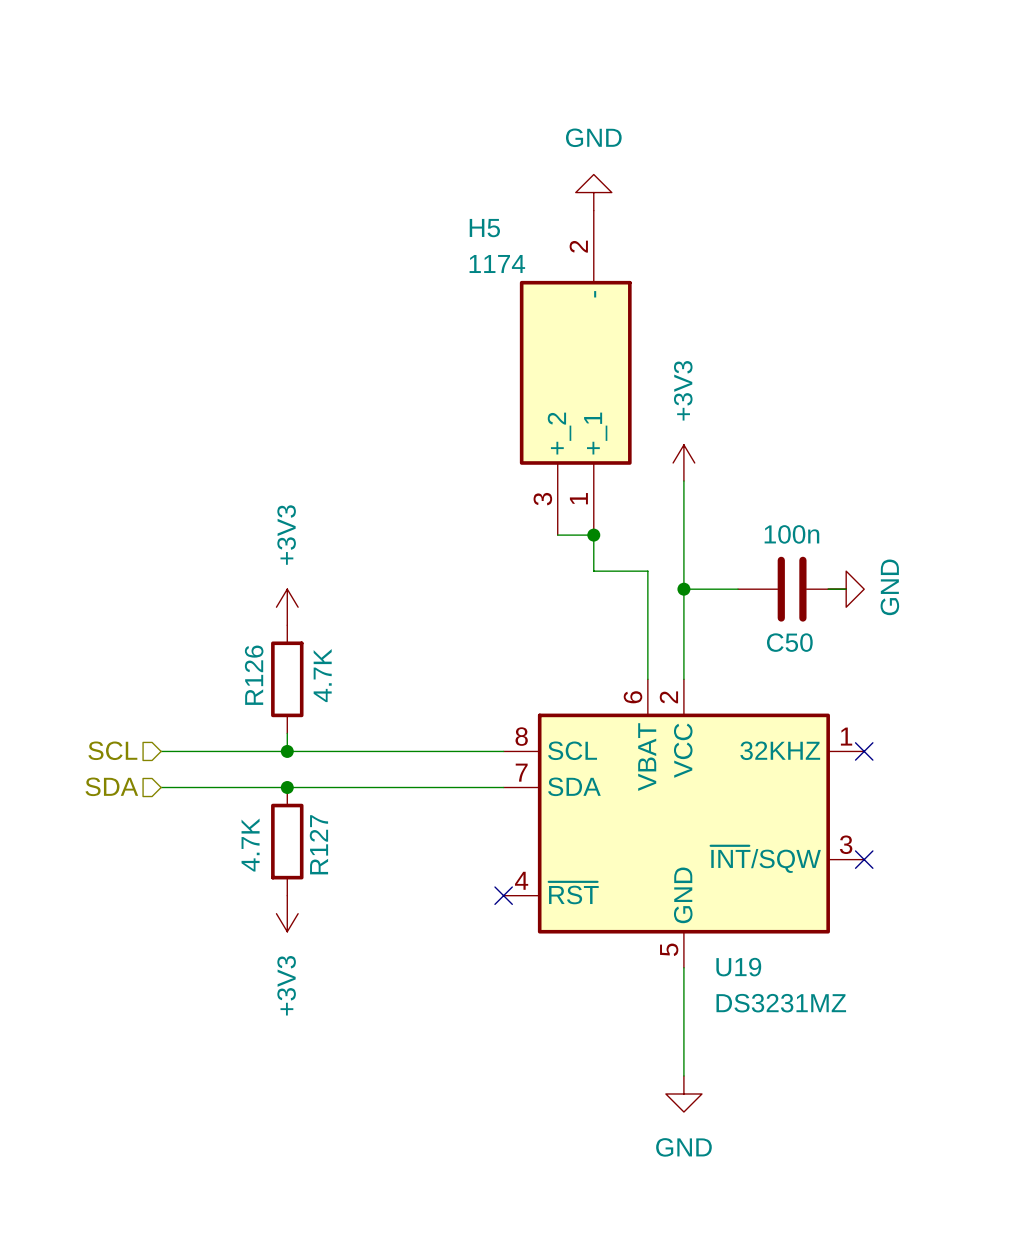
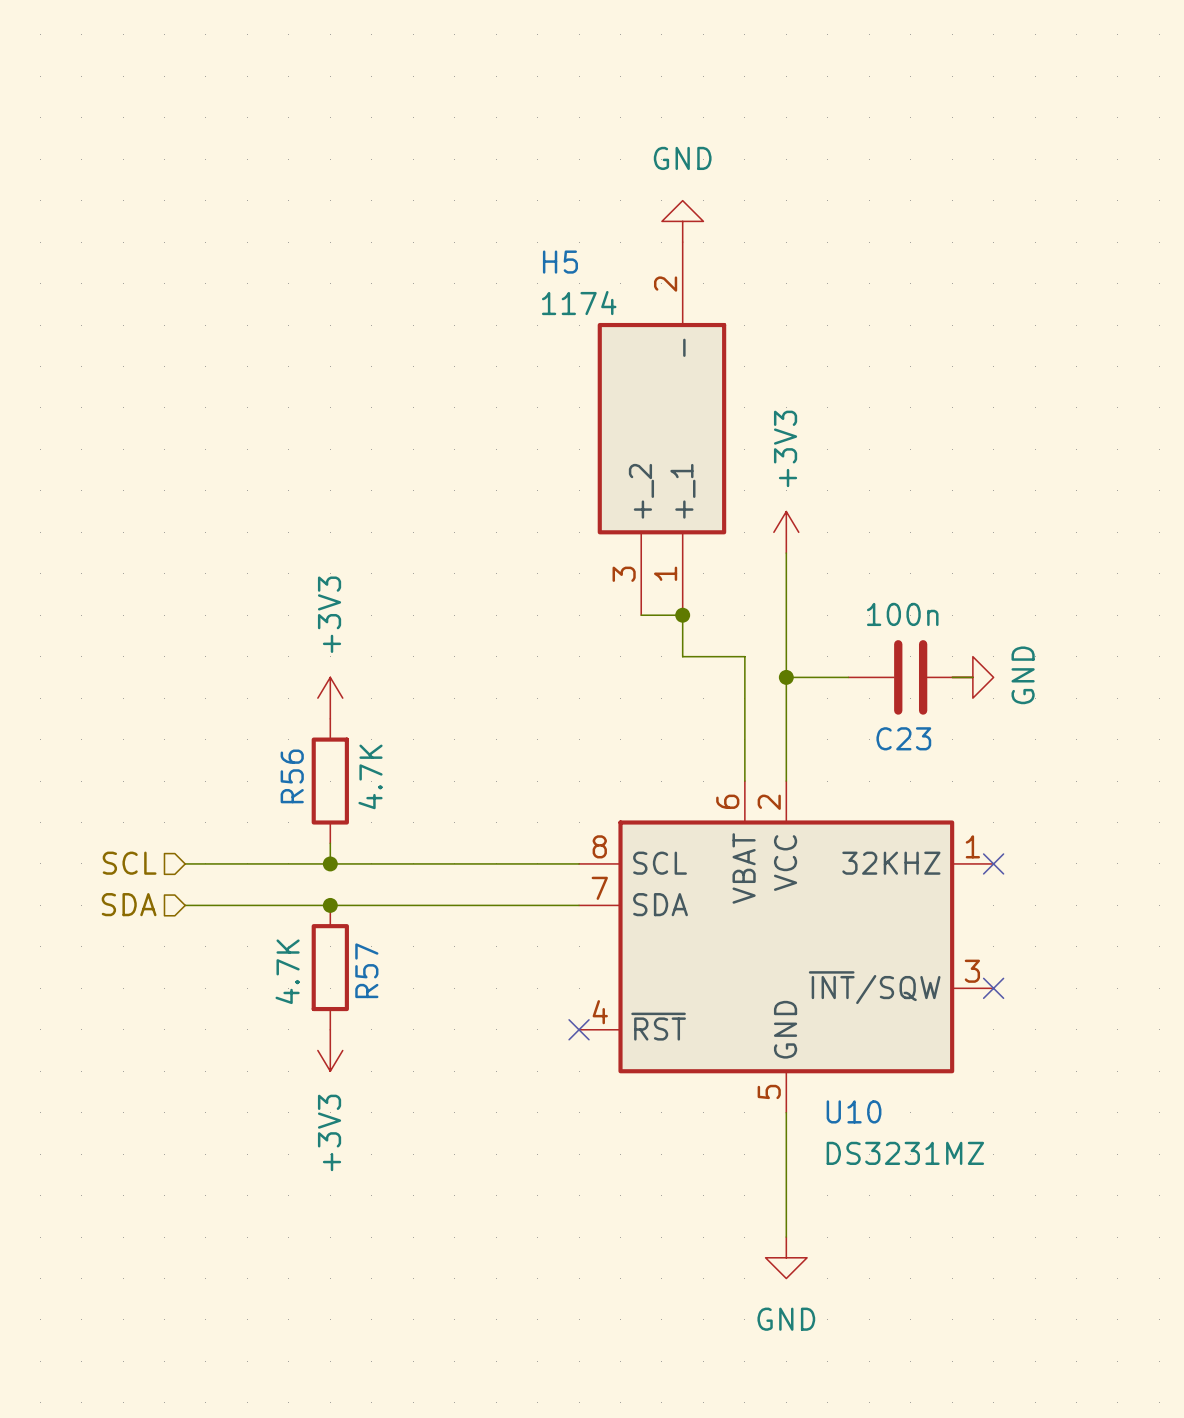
C50 name: C50 (789, 642) -> C23 (903, 738)
R126 name: R126 (254, 675) -> R56 (292, 776)
R127 name: R127 (318, 844) -> R57 (366, 970)
U19 name: U19 (738, 967) -> U10 (854, 1111)

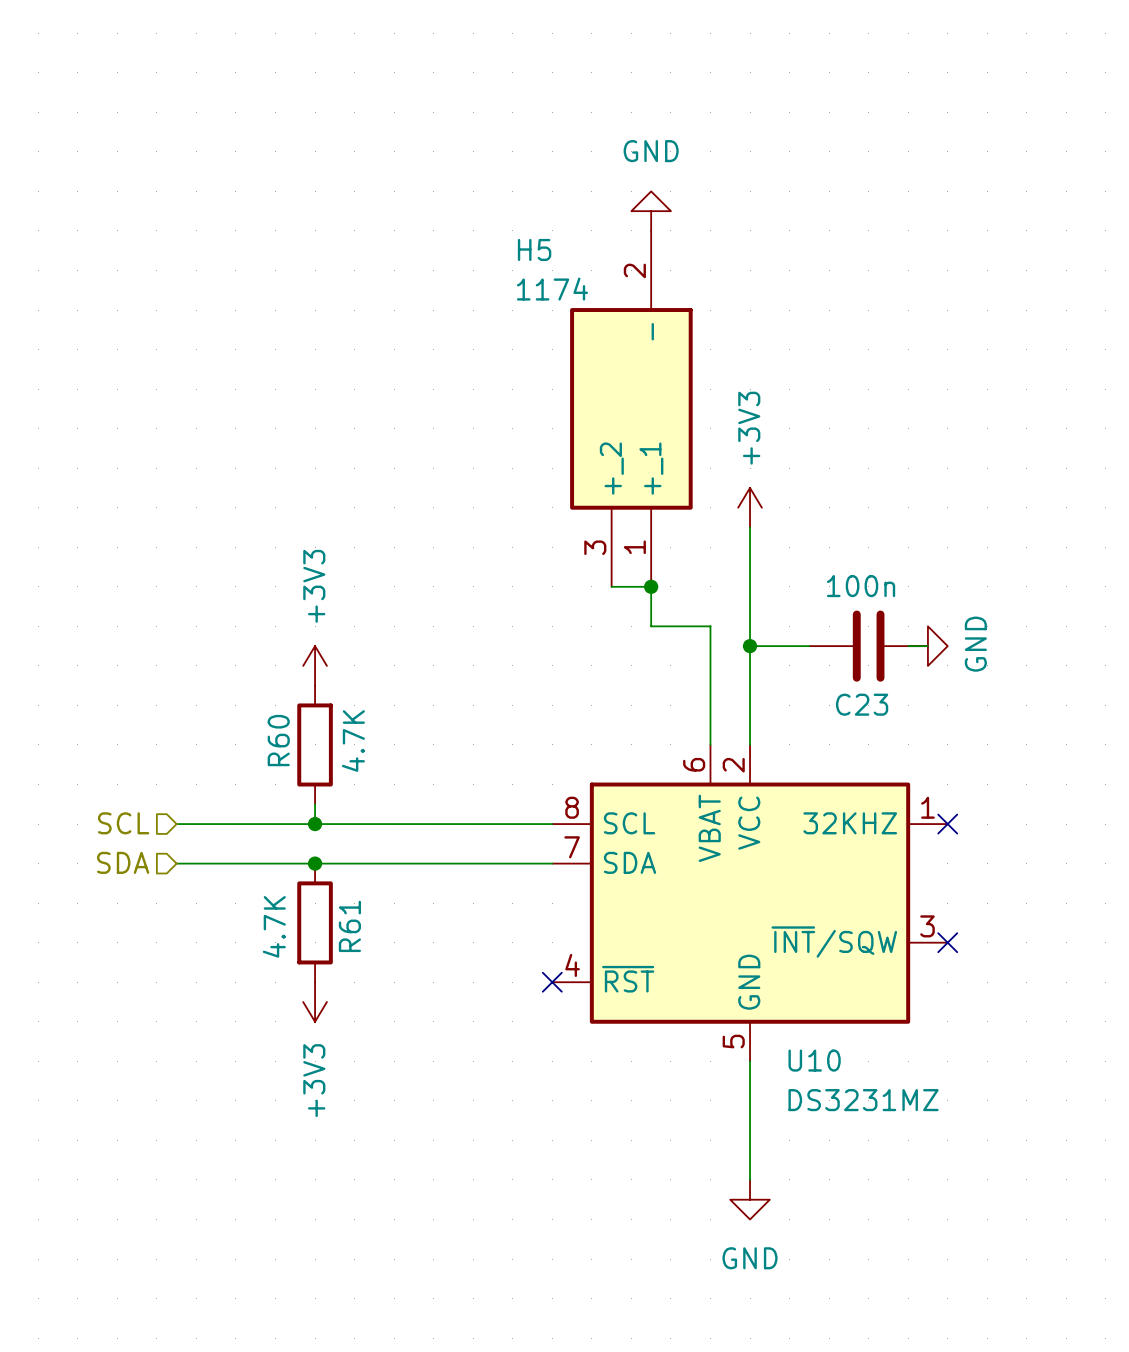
R56 name: R56 (292, 776) -> R60 (278, 740)
R57 name: R57 (366, 970) -> R61 (349, 926)

